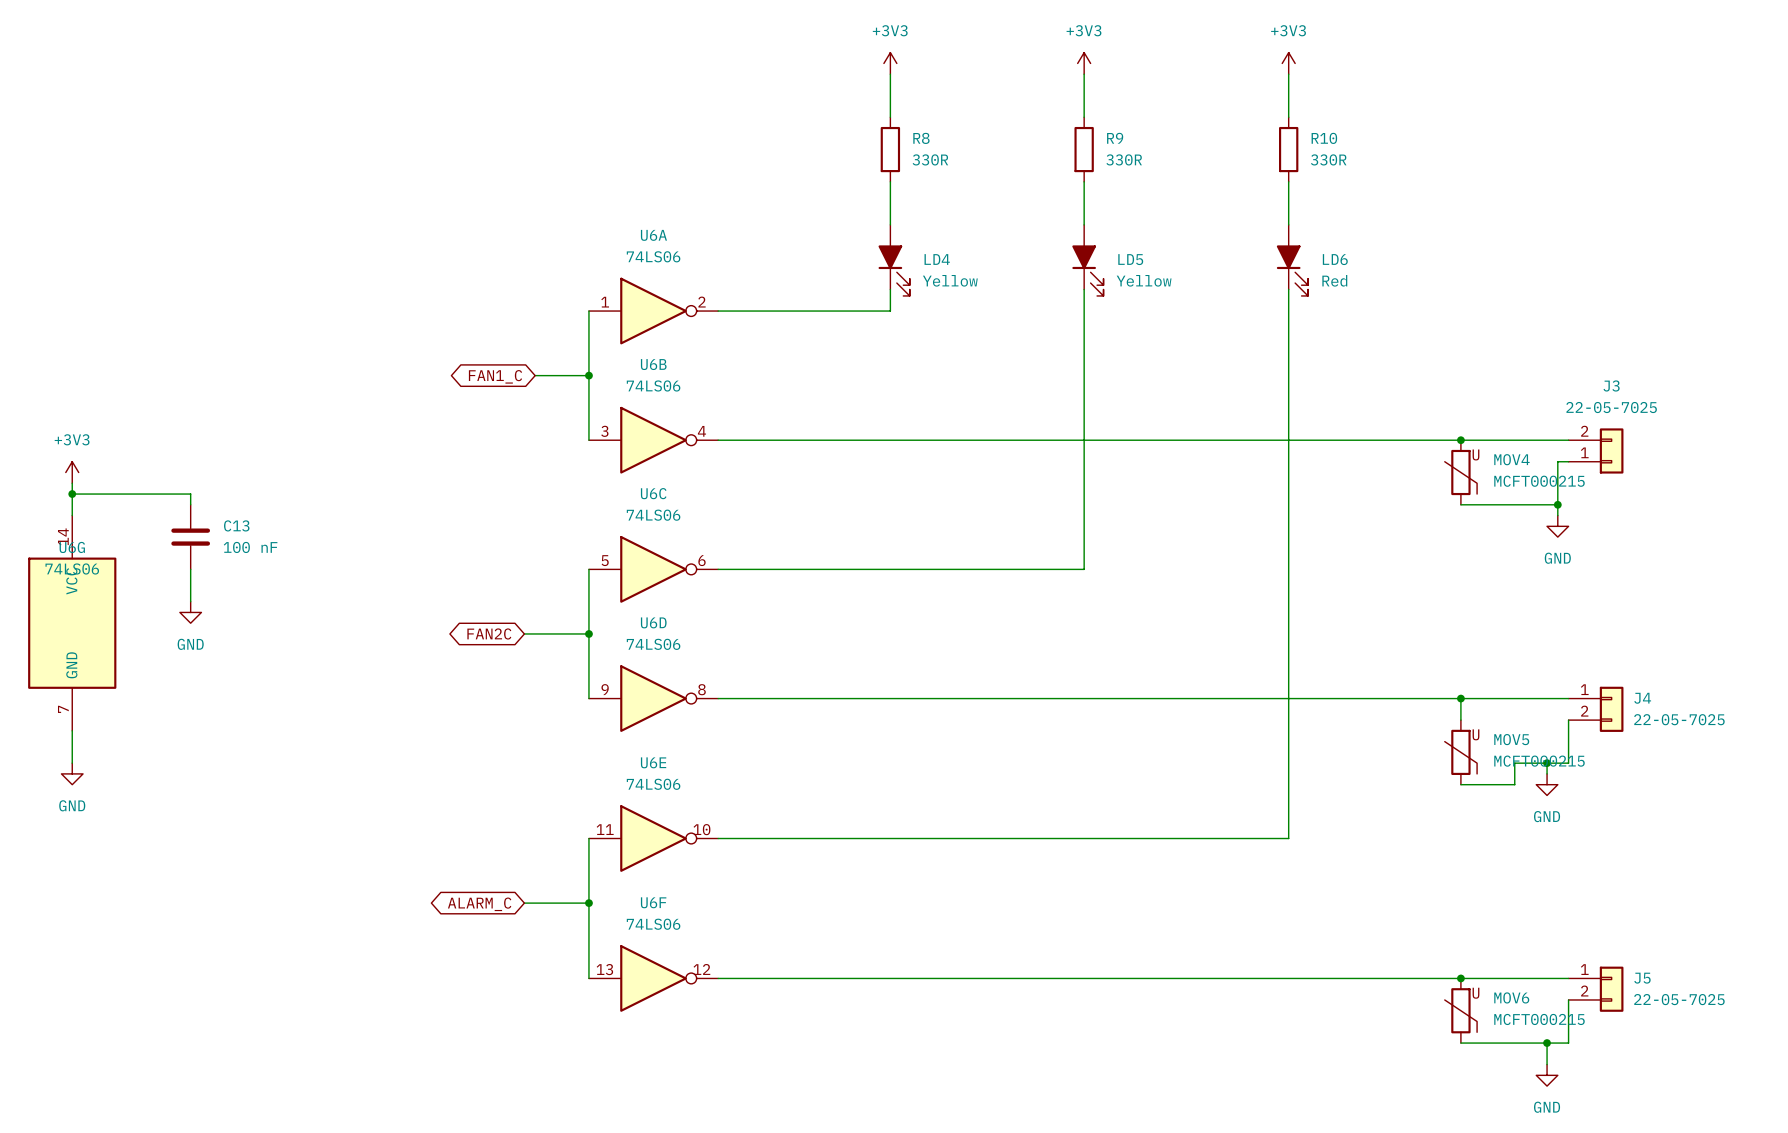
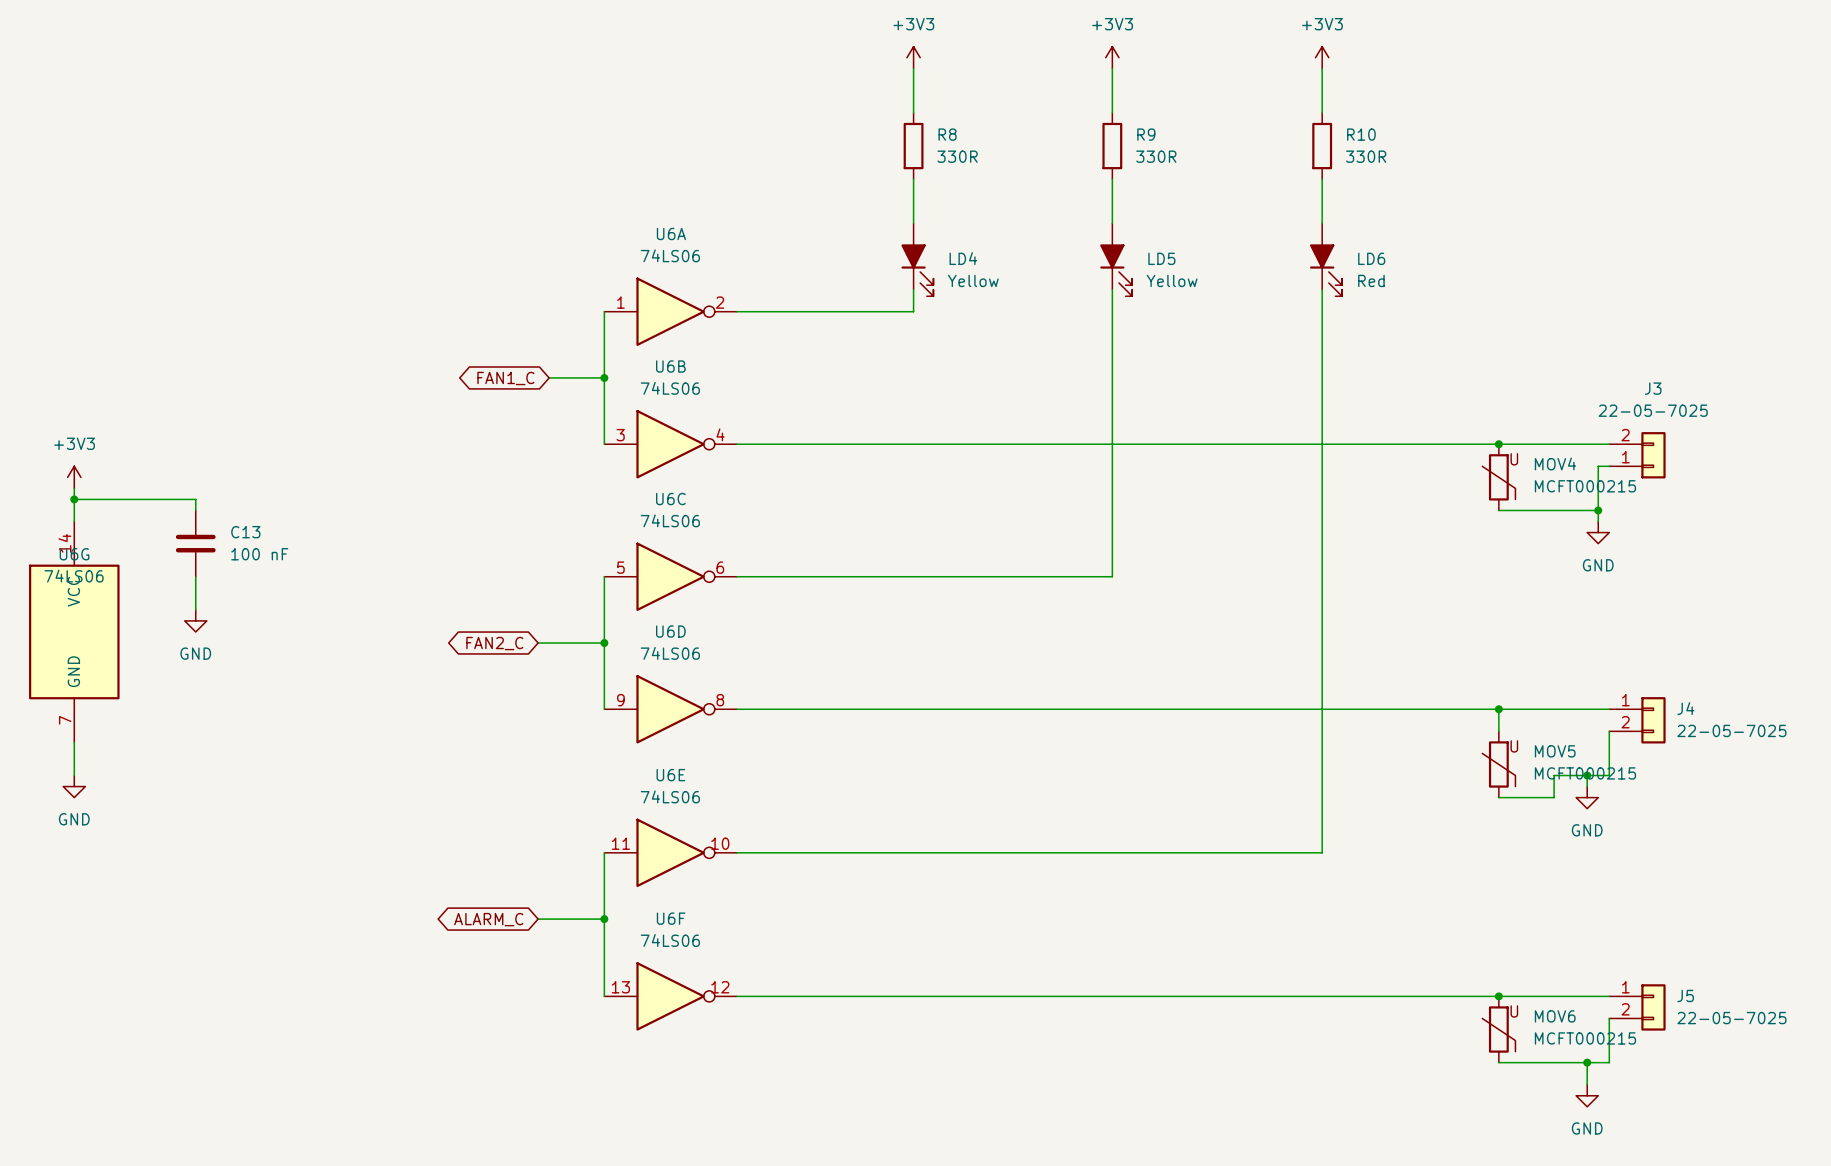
global label: FAN2C (489, 633) -> FAN2_C (494, 643)

